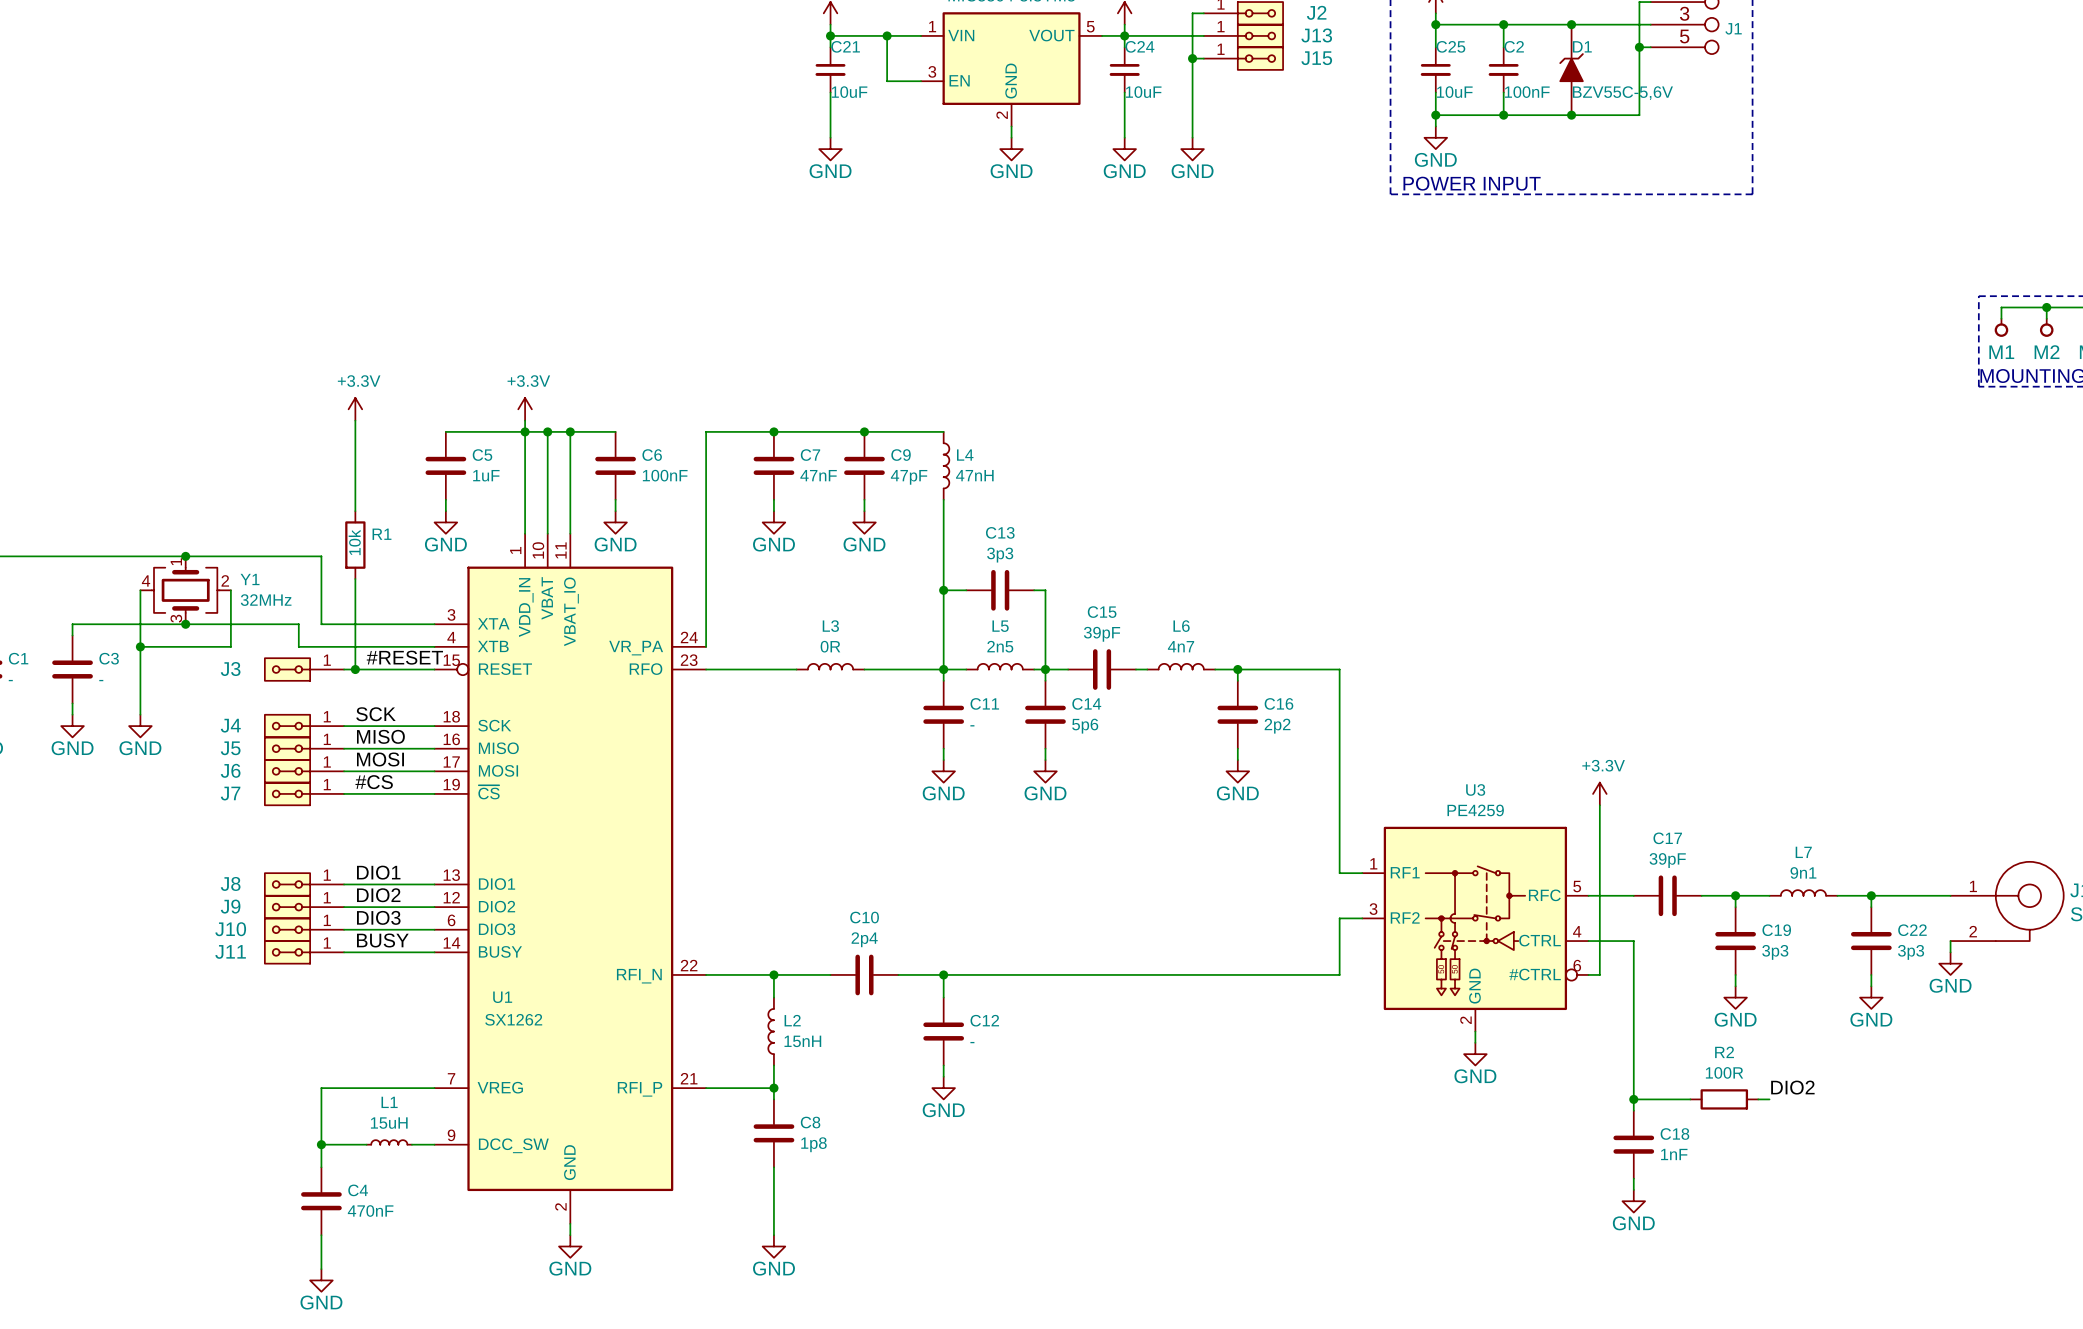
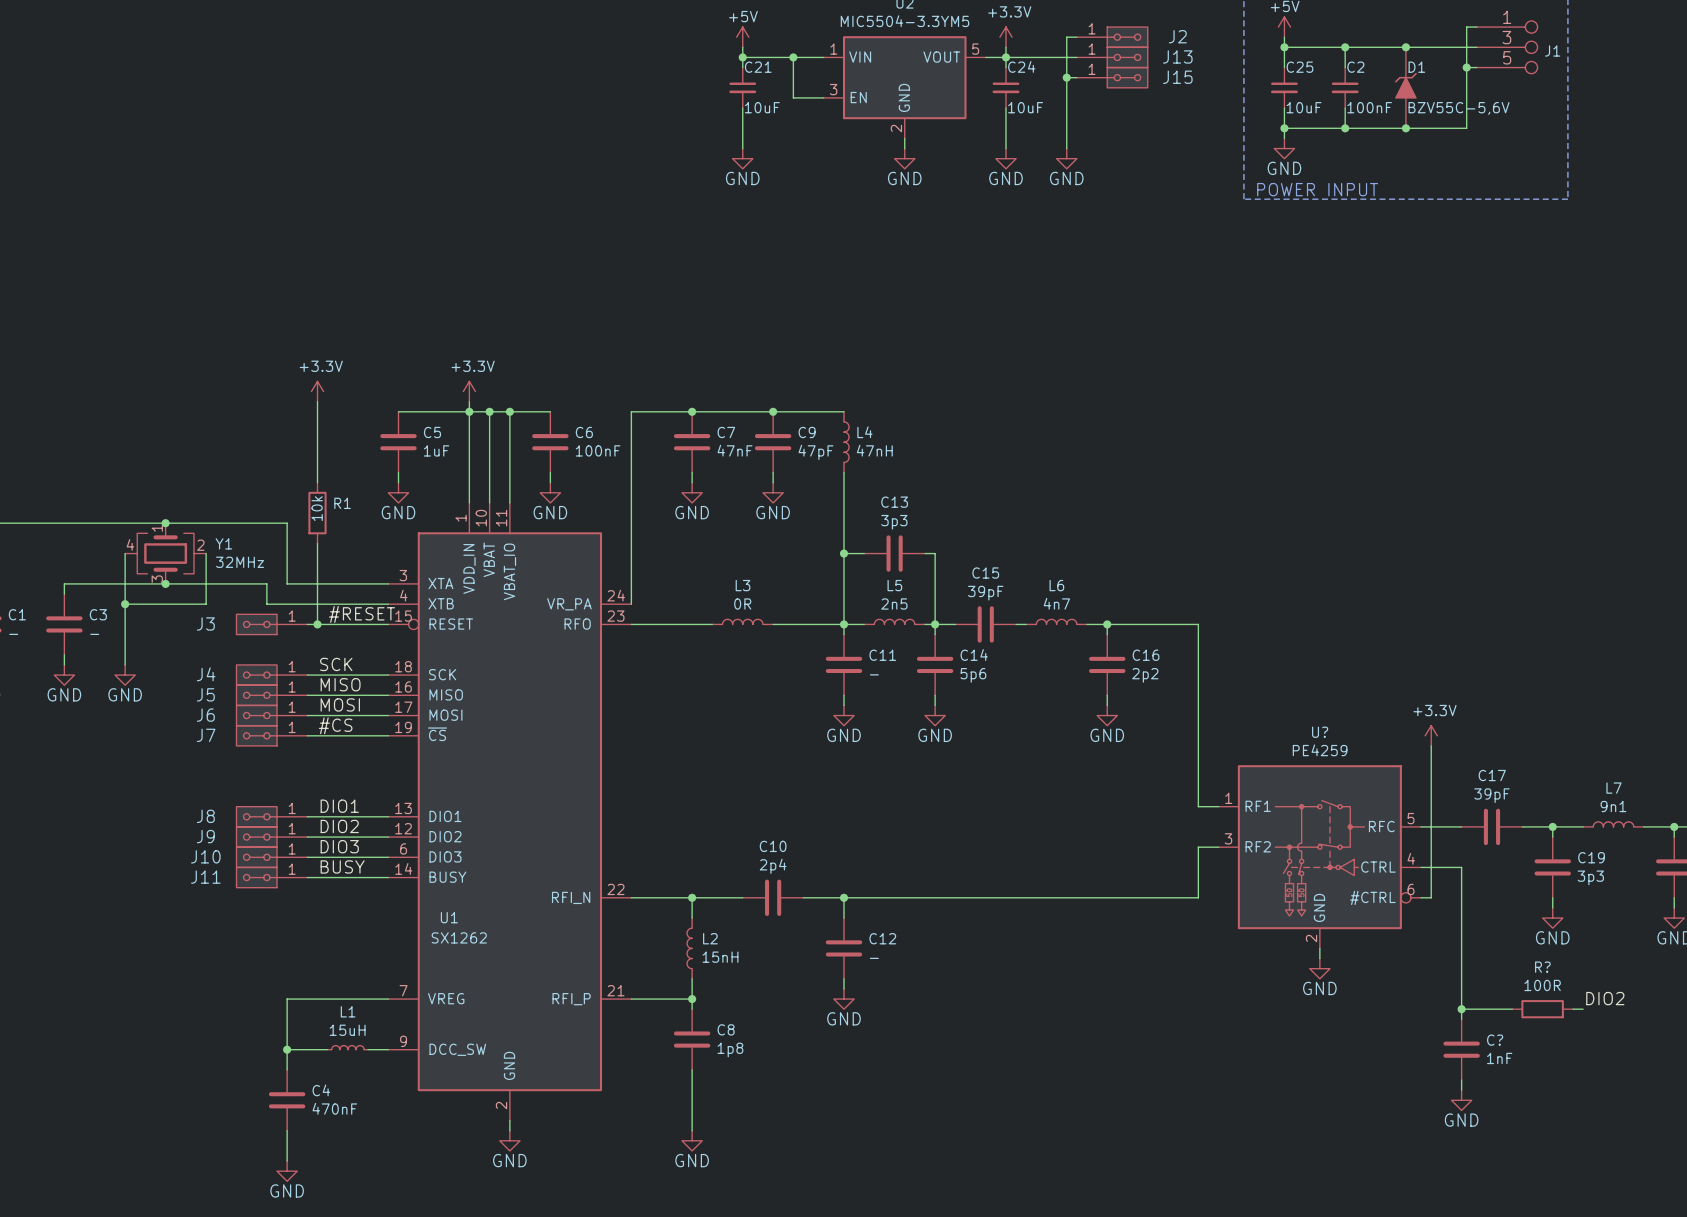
U3 name: U3 (1475, 789) -> U? (1320, 732)
R2 name: R2 (1724, 1052) -> R? (1542, 967)
C18 name: C18 (1674, 1134) -> C? (1495, 1040)

